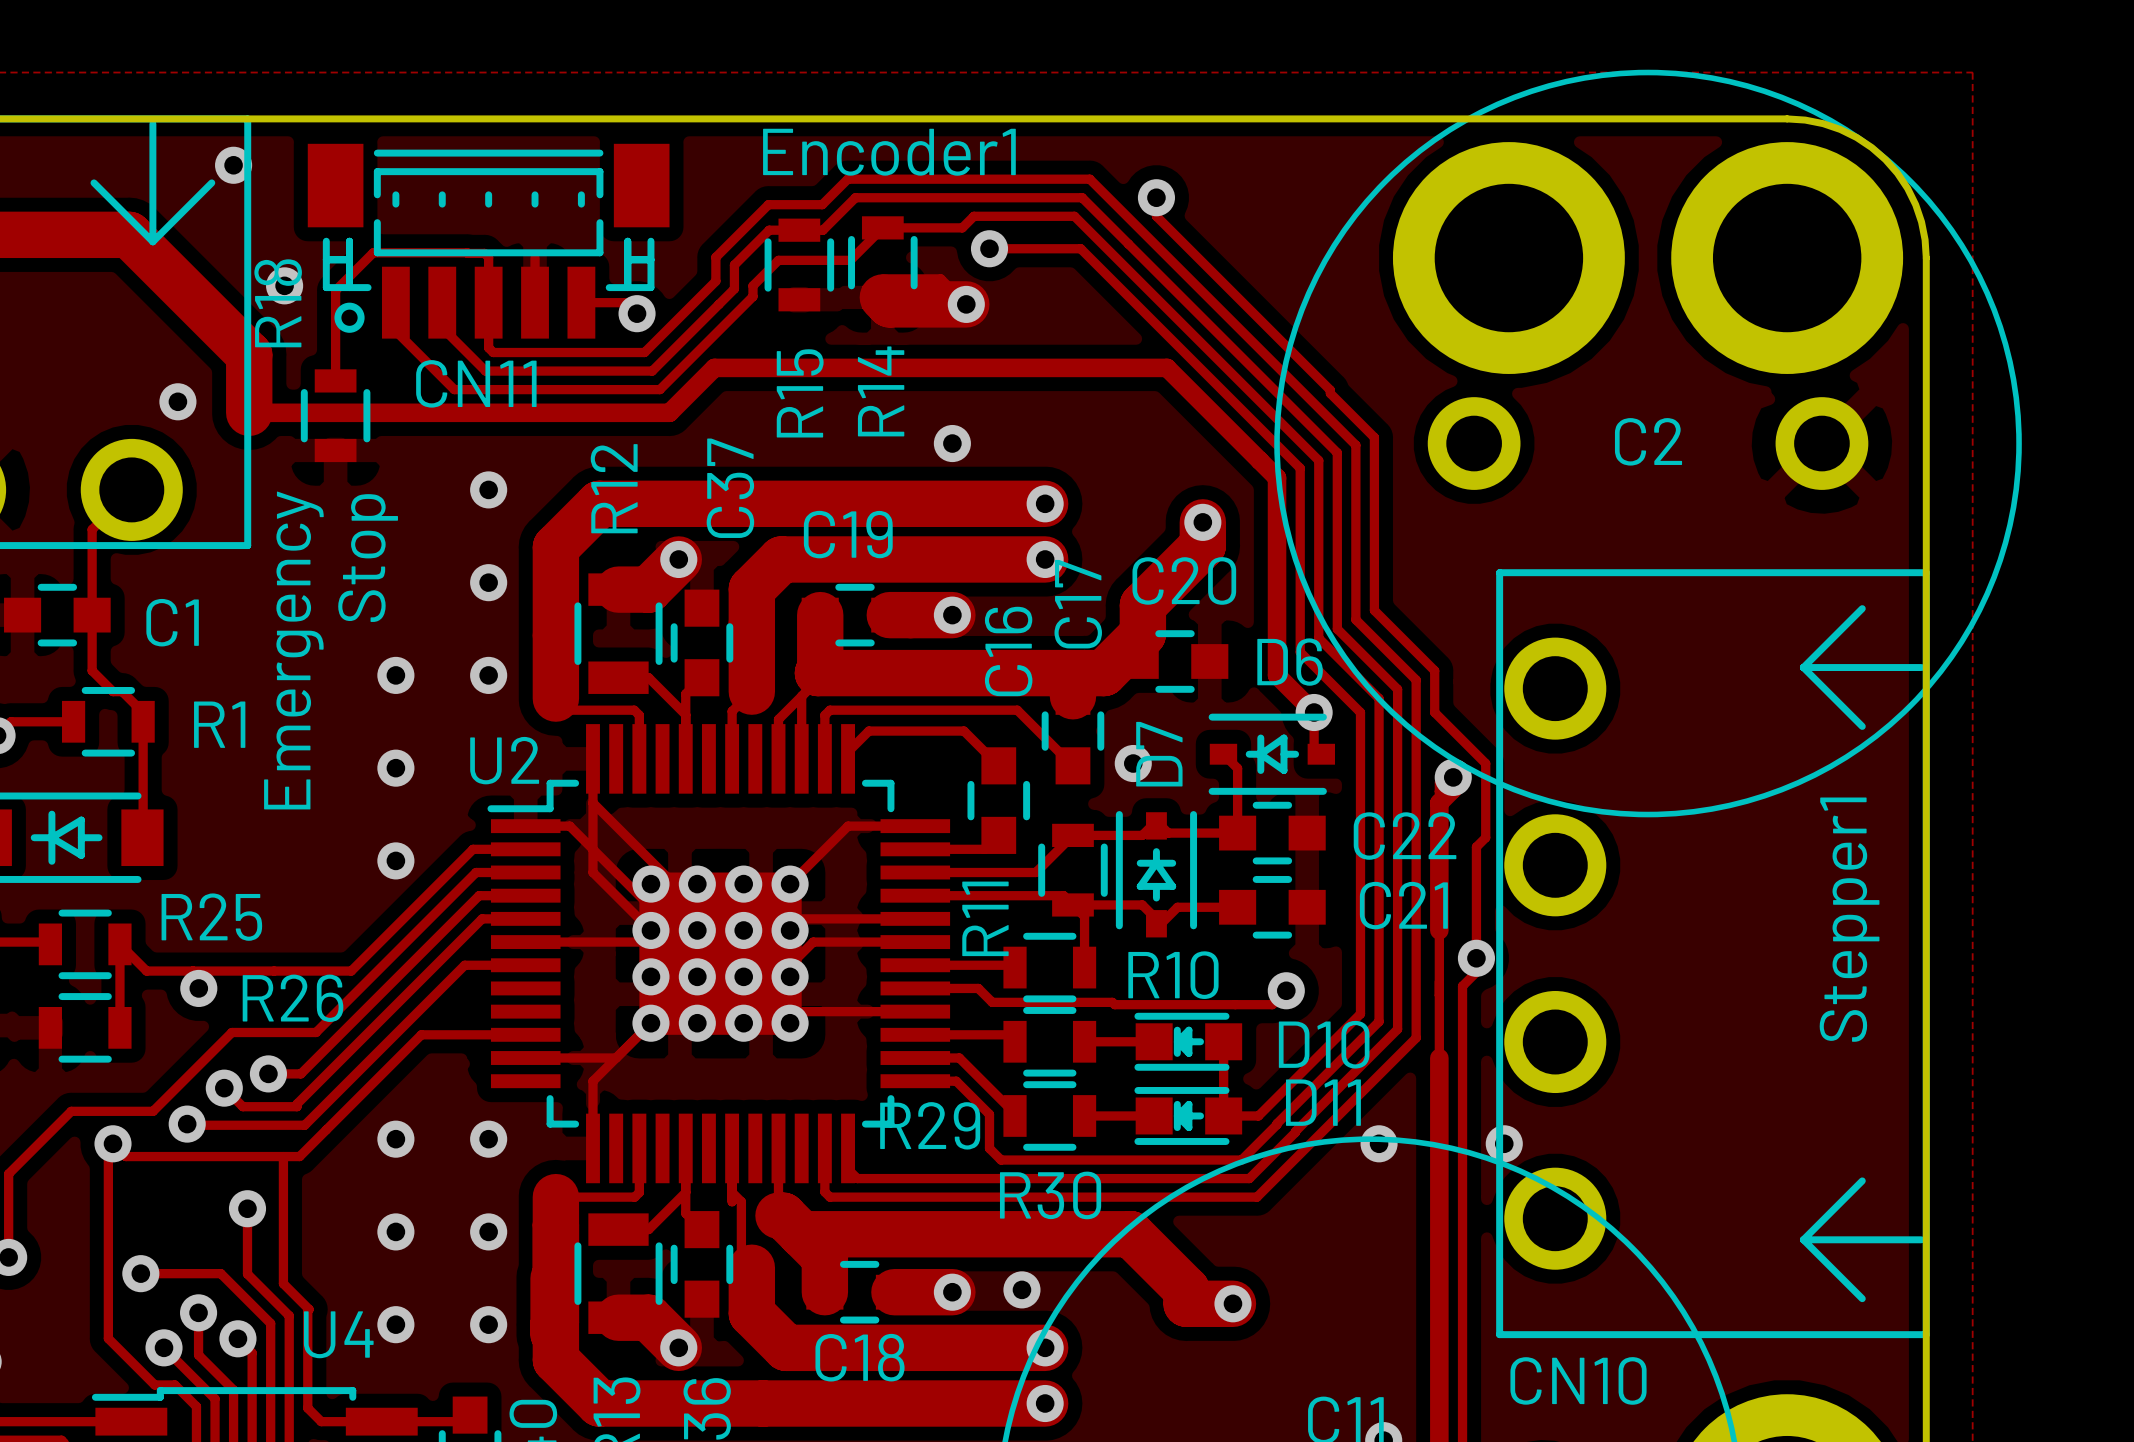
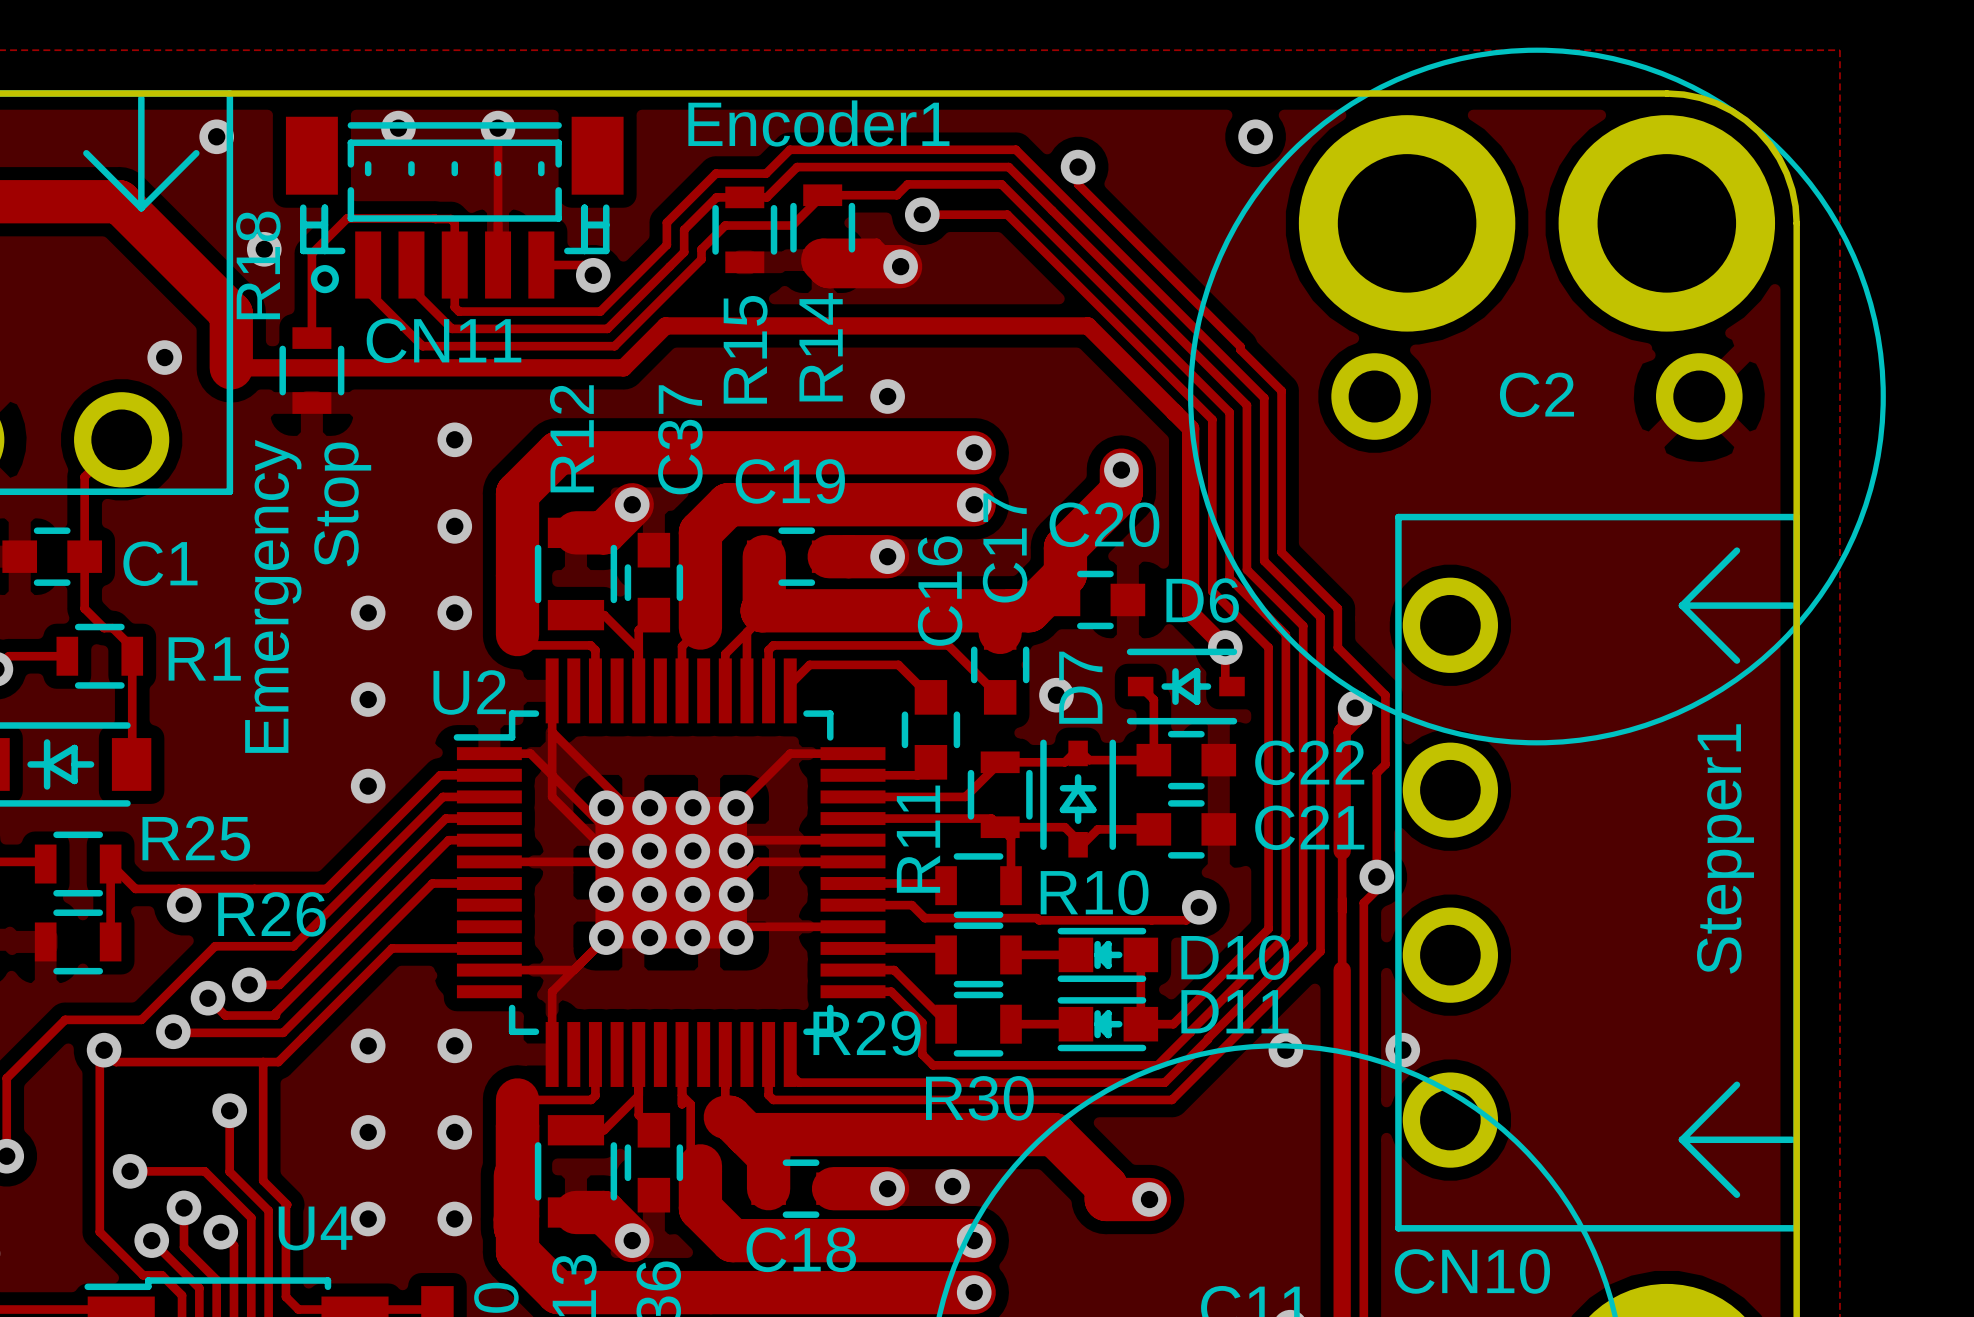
via: none -> (398, 128)
track: none -> (498, 128) (498, 223)
via: none -> (498, 128)
via: none -> (1255, 136)

